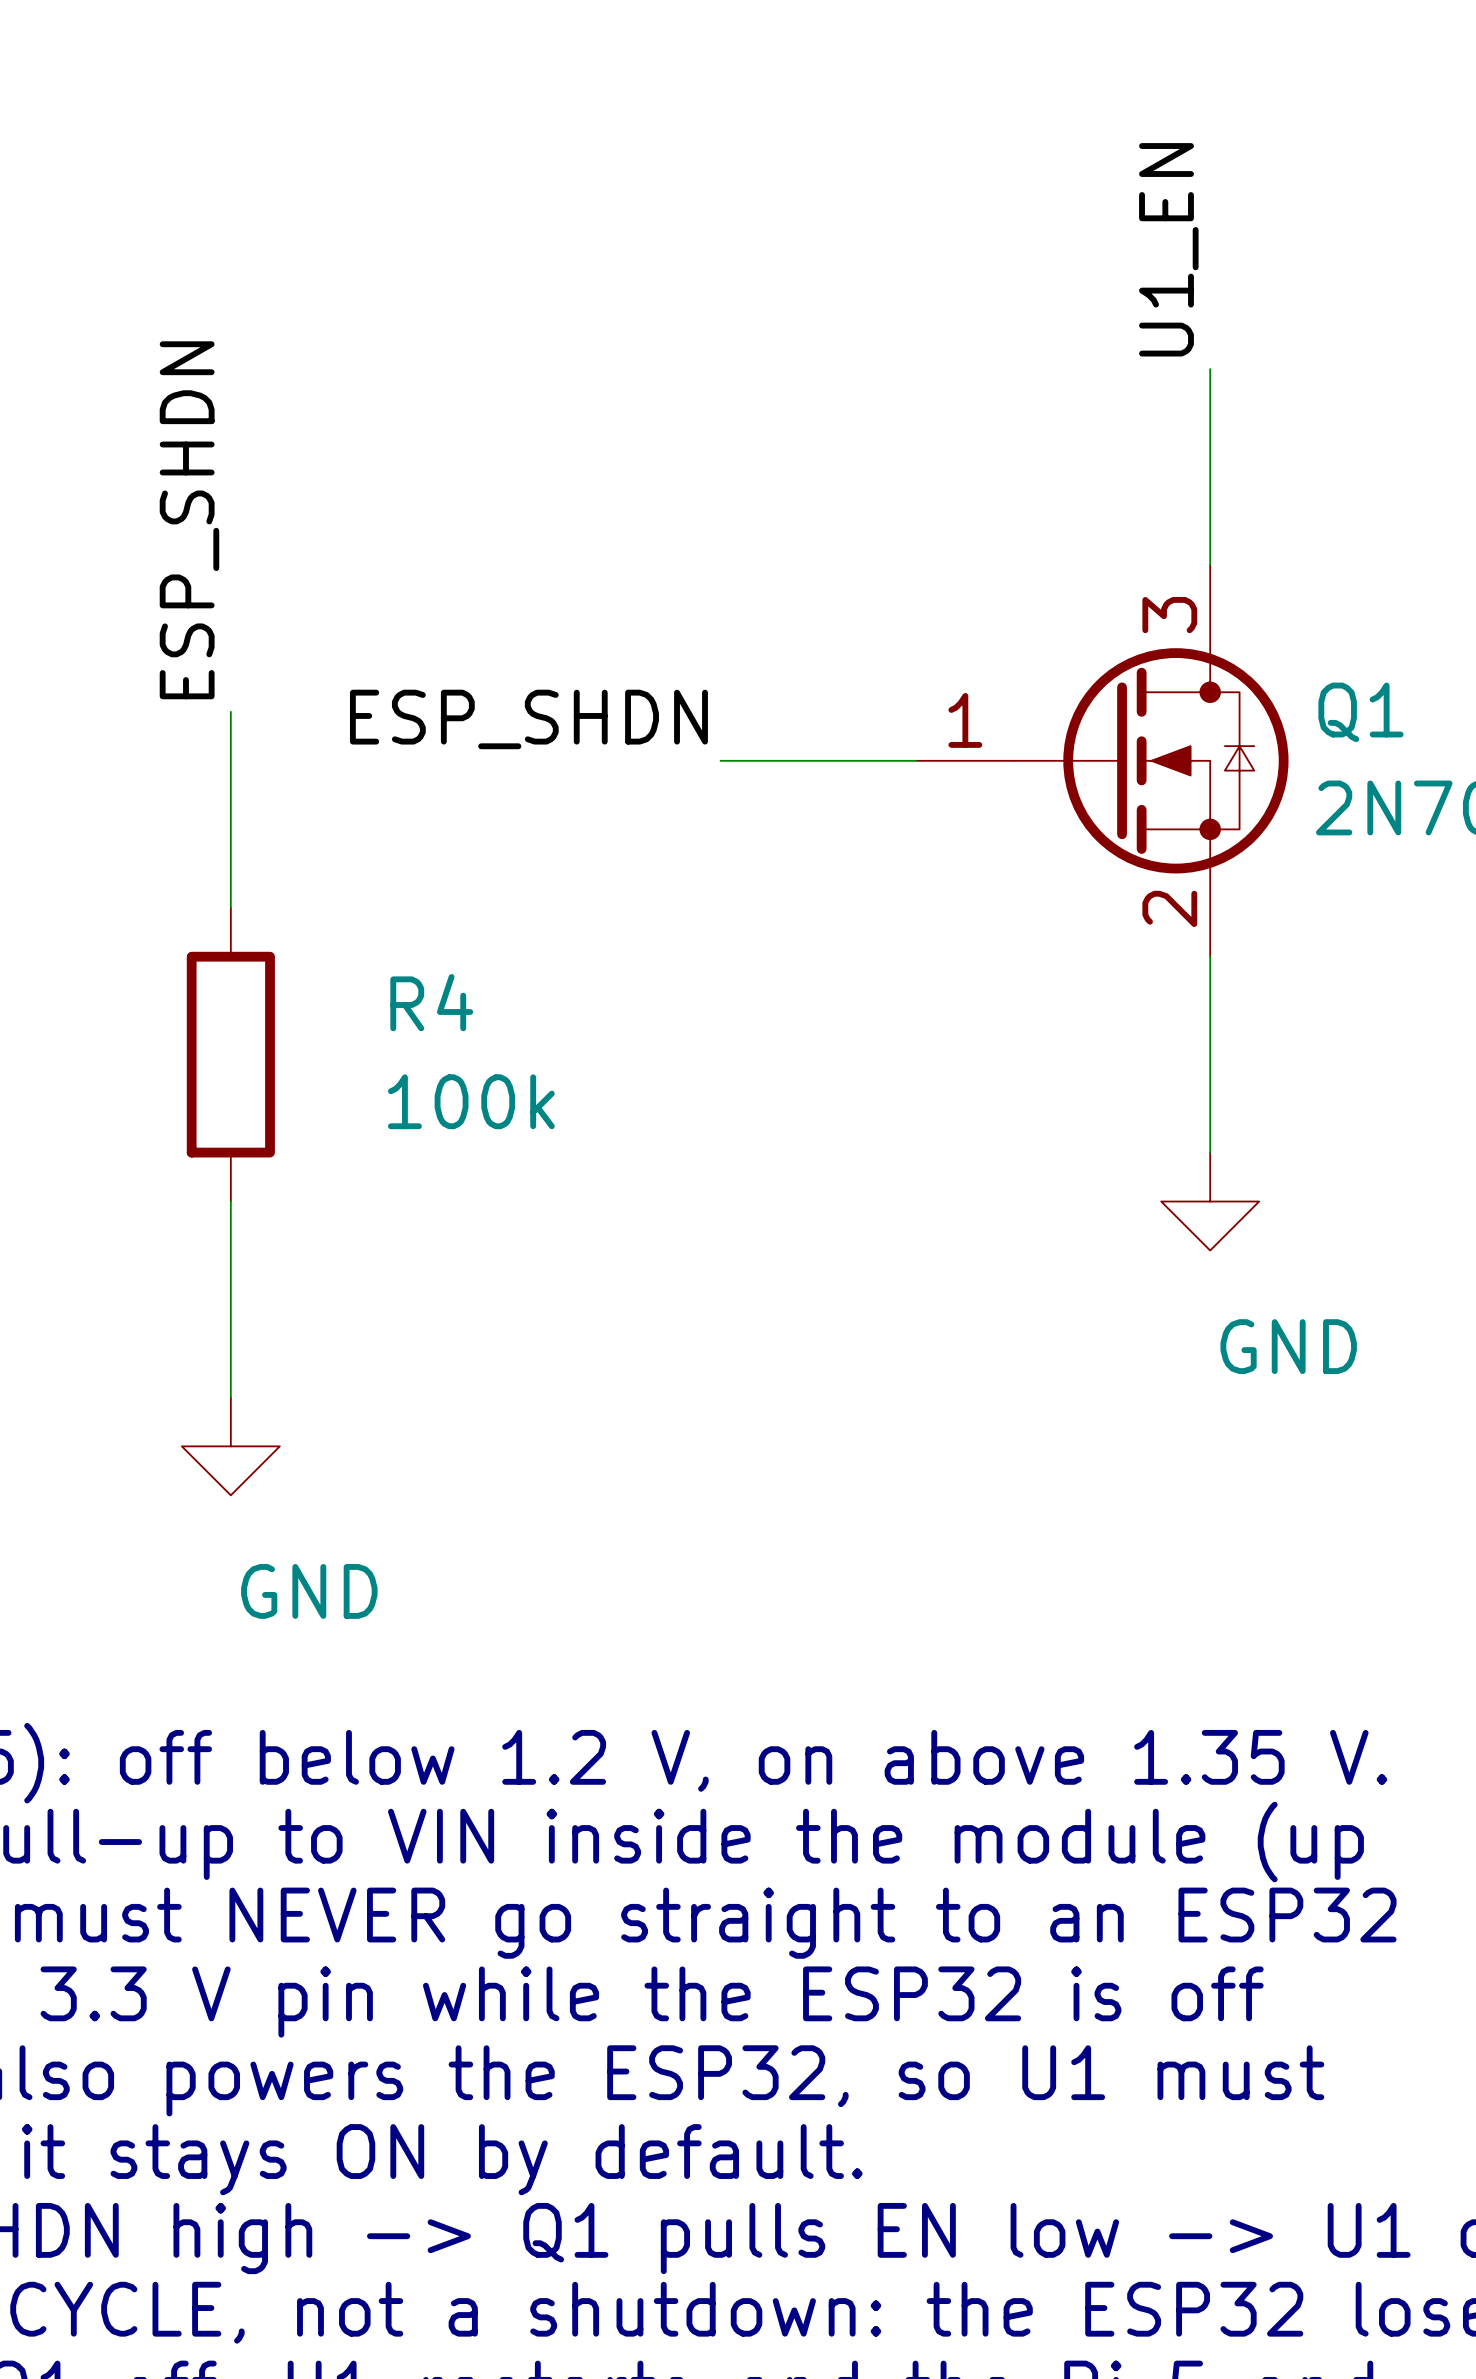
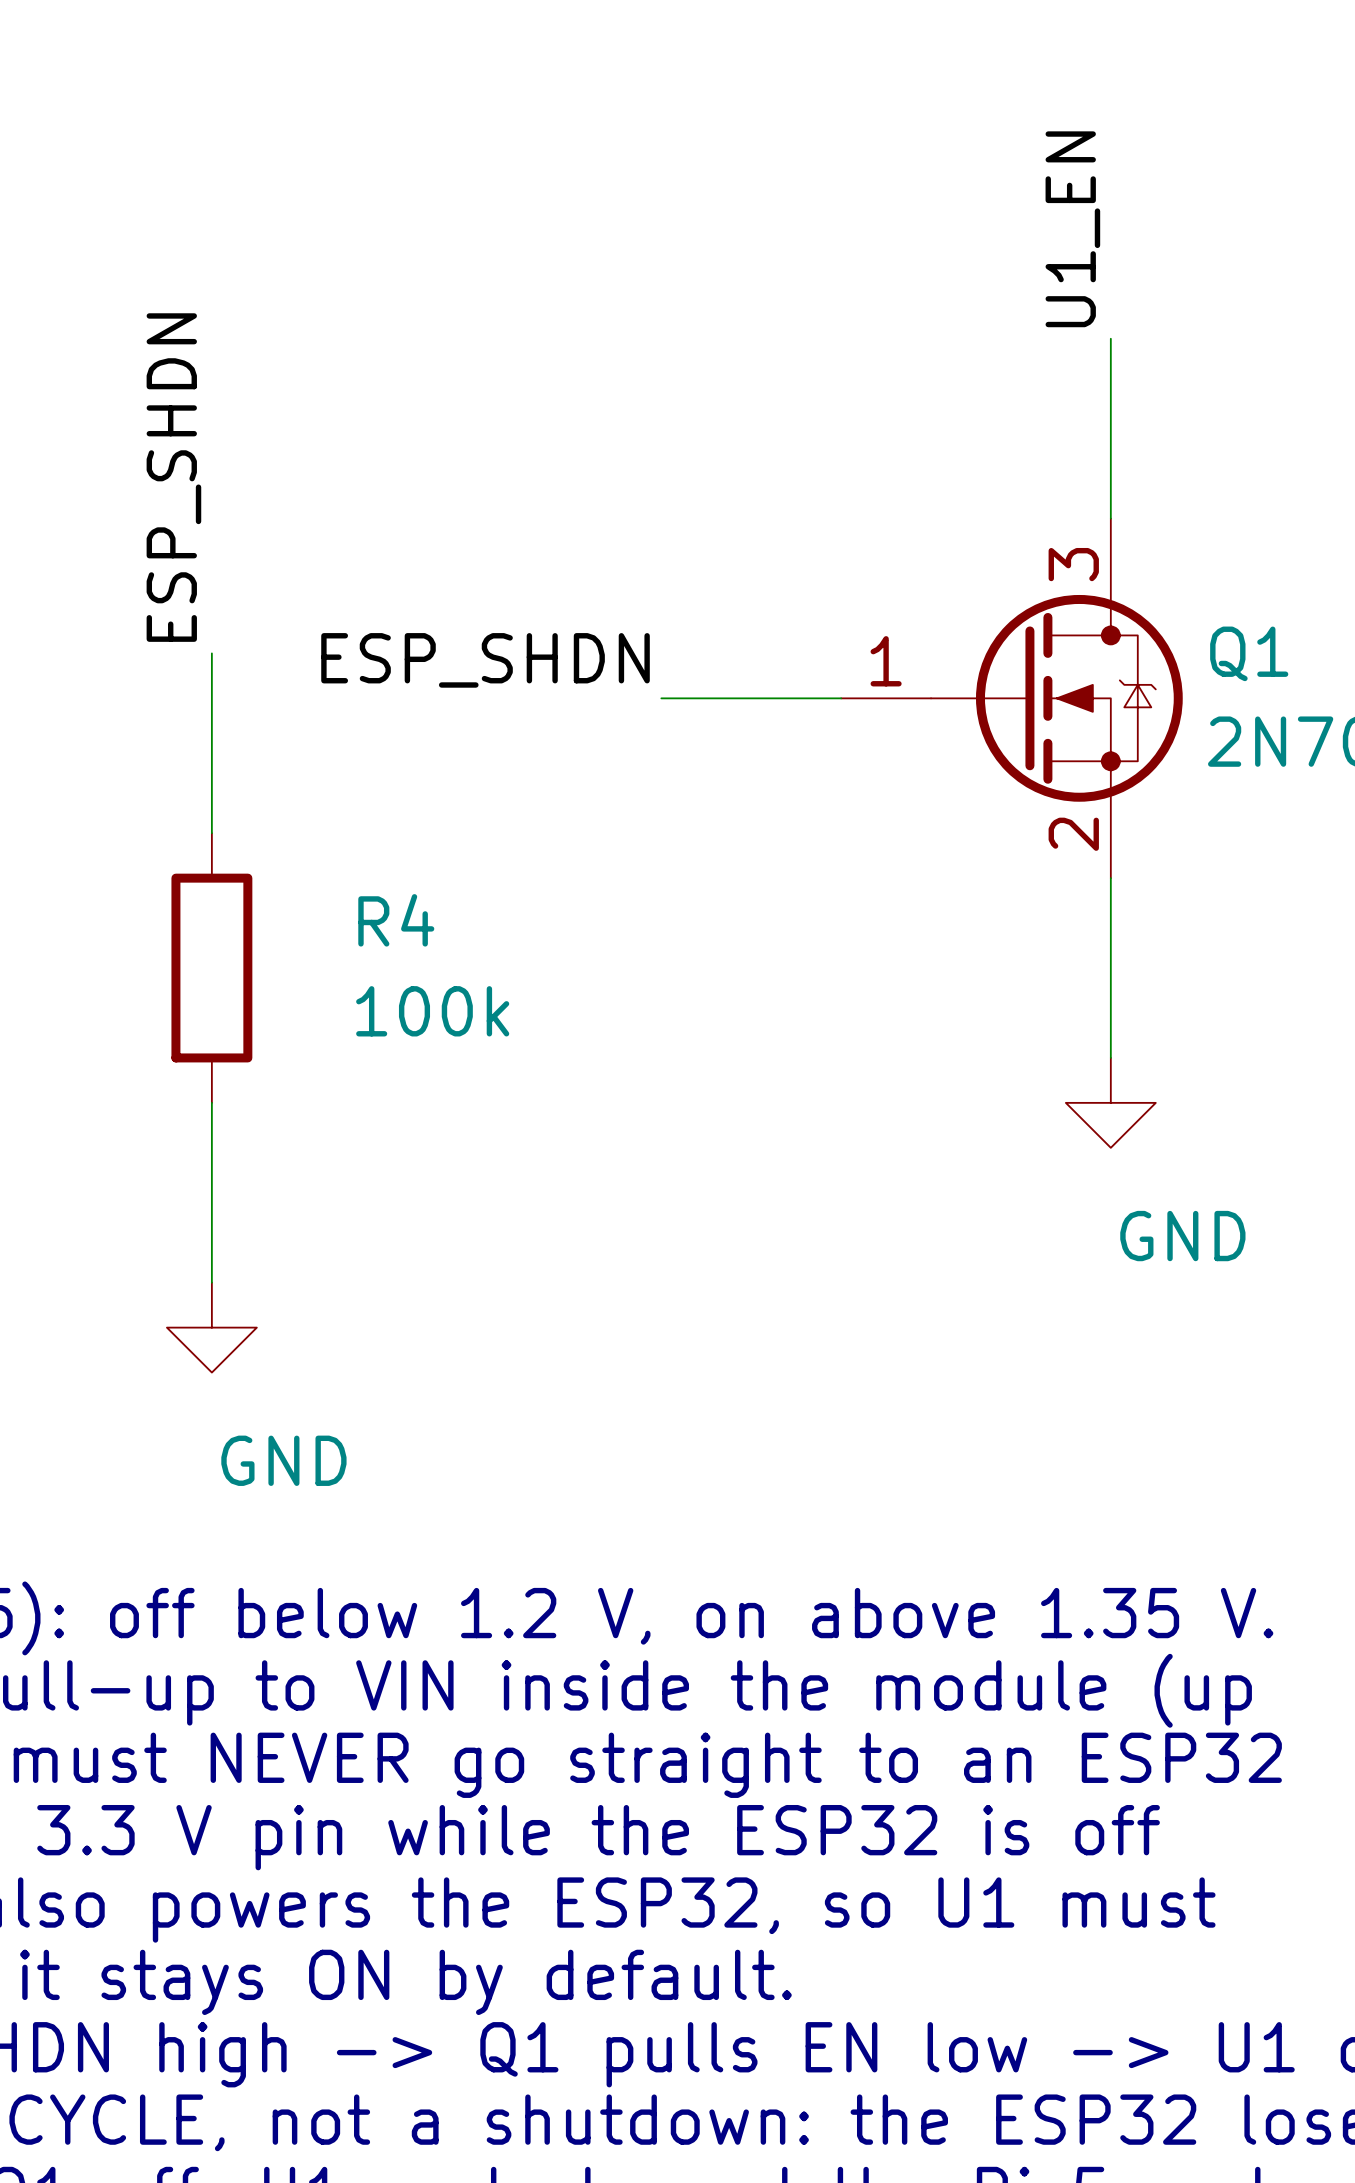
Q1 symbol: [916, 564, 1289, 957] -> [841, 518, 1183, 879]

